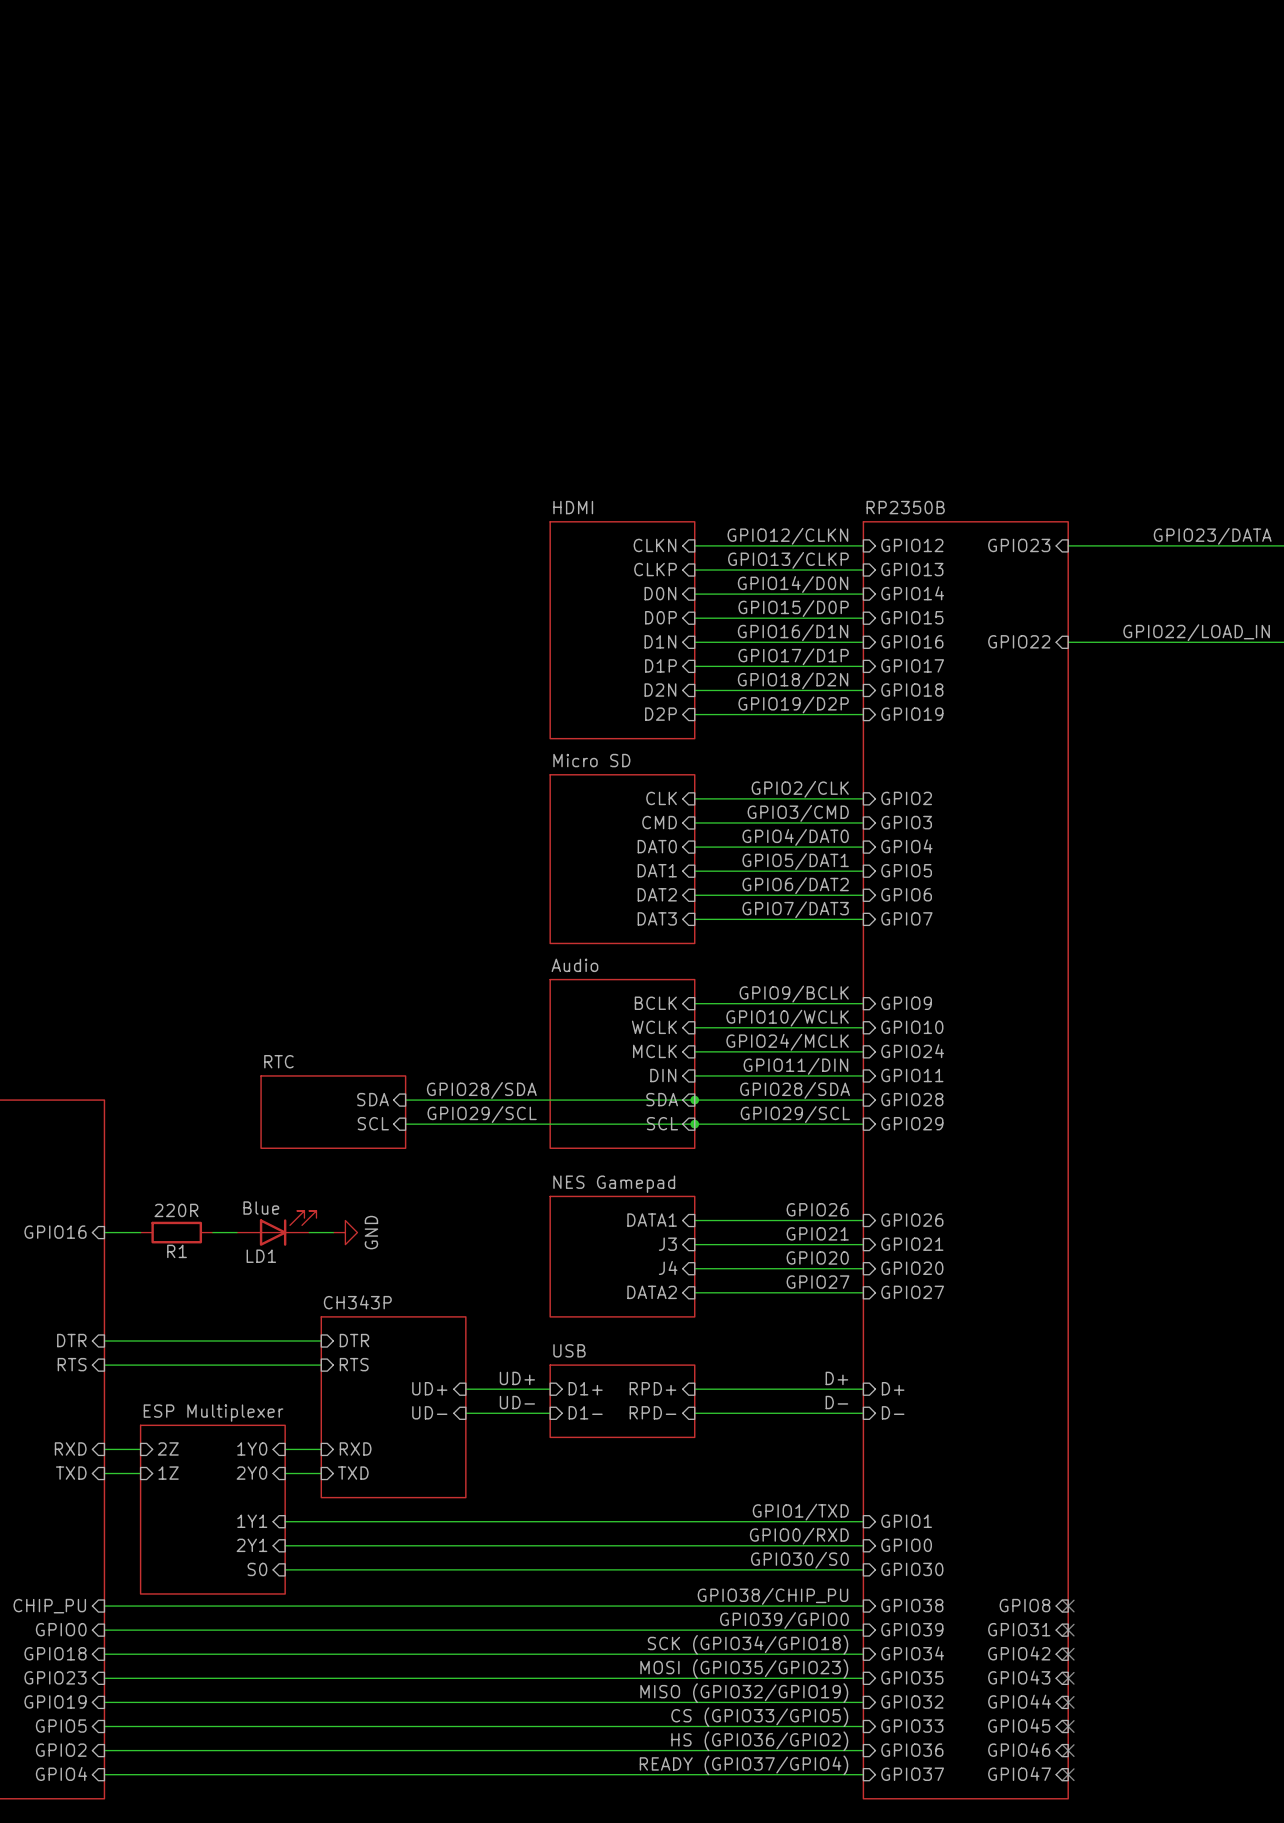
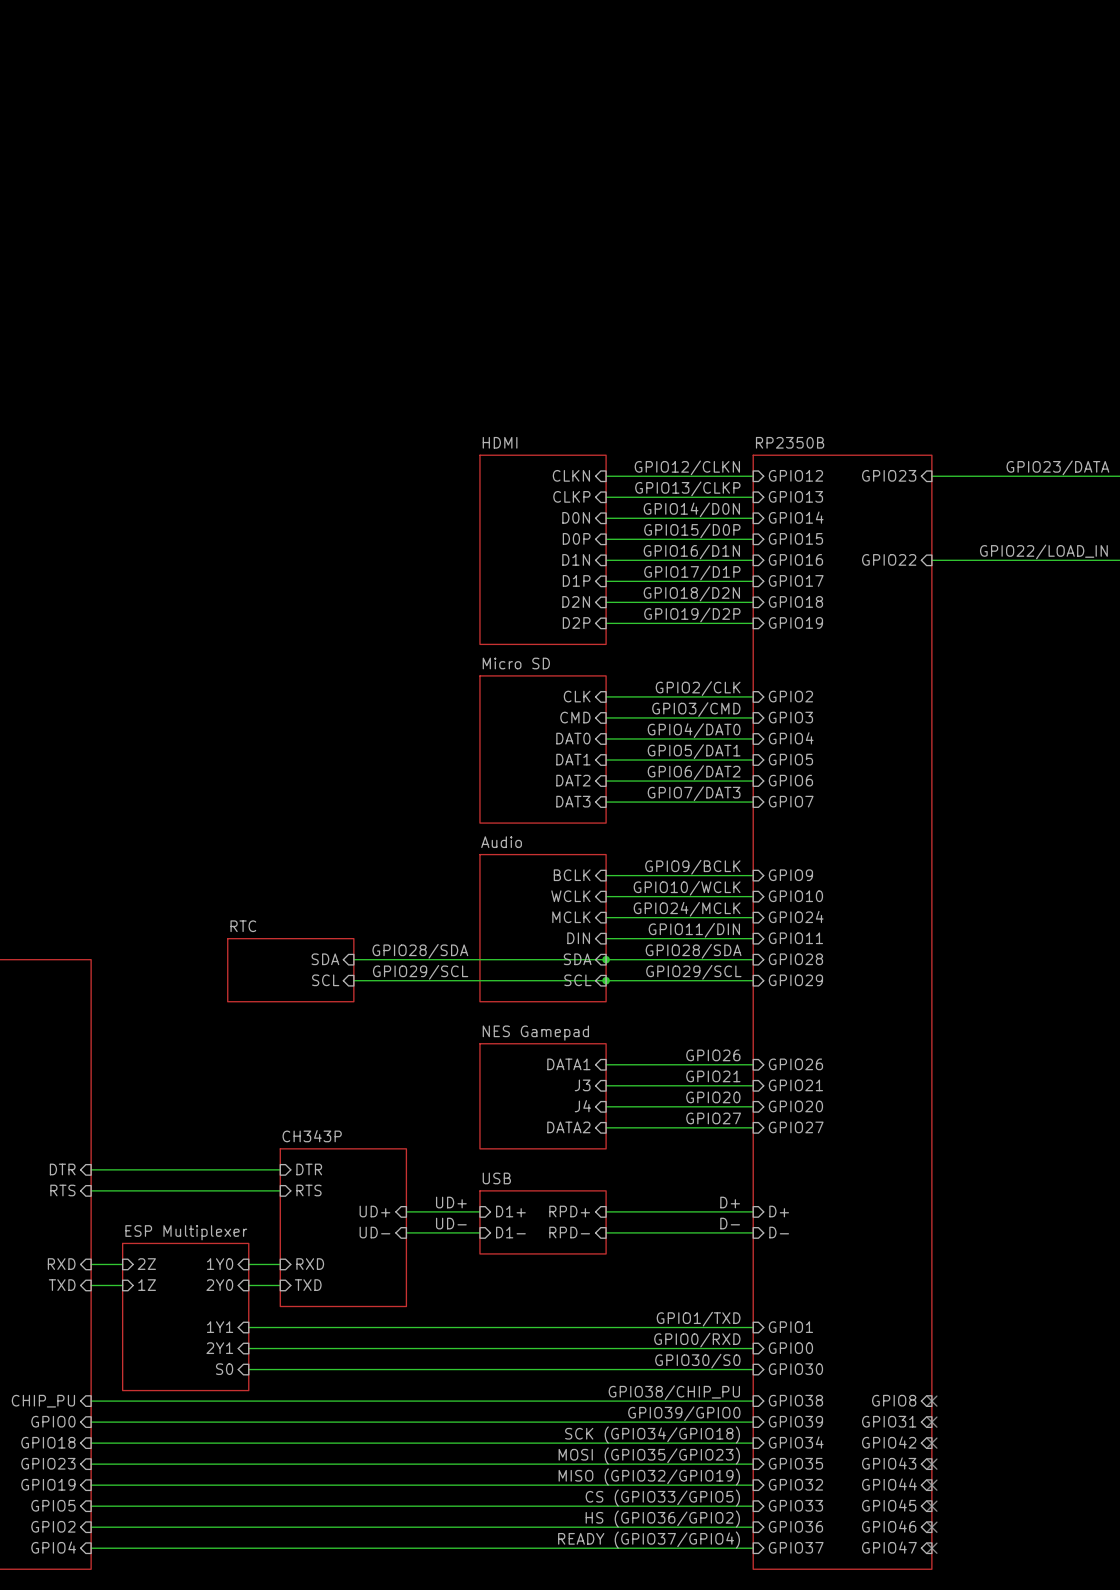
LD1: Blue (276, 1228) -> none
sheet pin: GPIO16 (55, 1232) -> none
wire: (104, 1232) (140, 1232) -> none
R1: 220R (176, 1232) -> none
wire: (212, 1232) (236, 1232) -> none
wire: (309, 1232) (333, 1232) -> none
power symbol: GND (345, 1232) -> none

